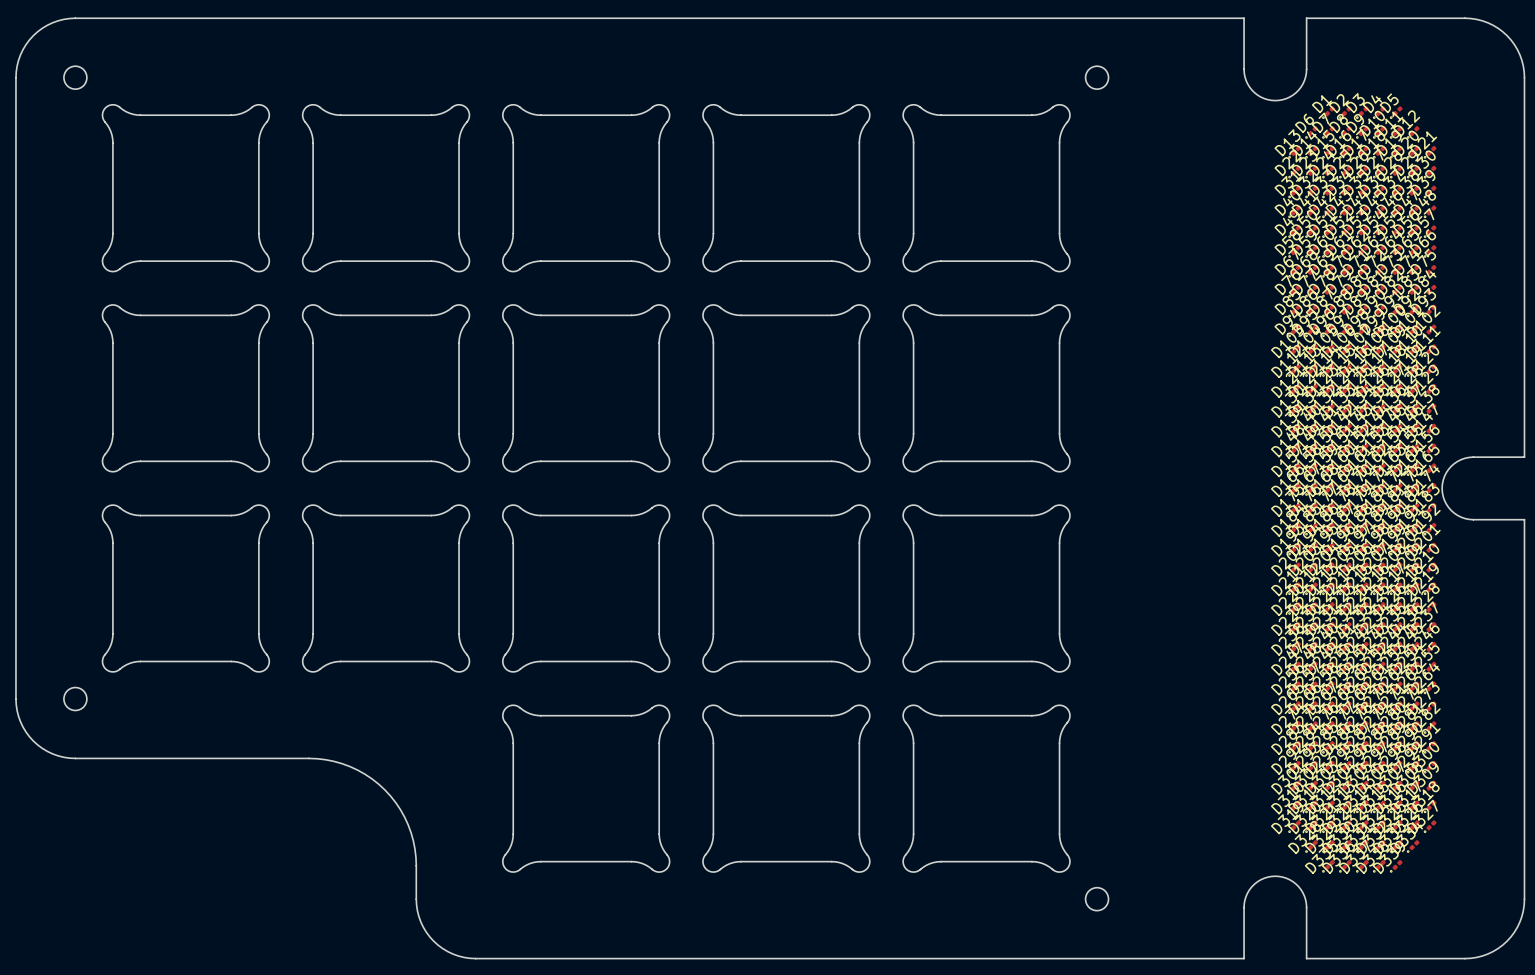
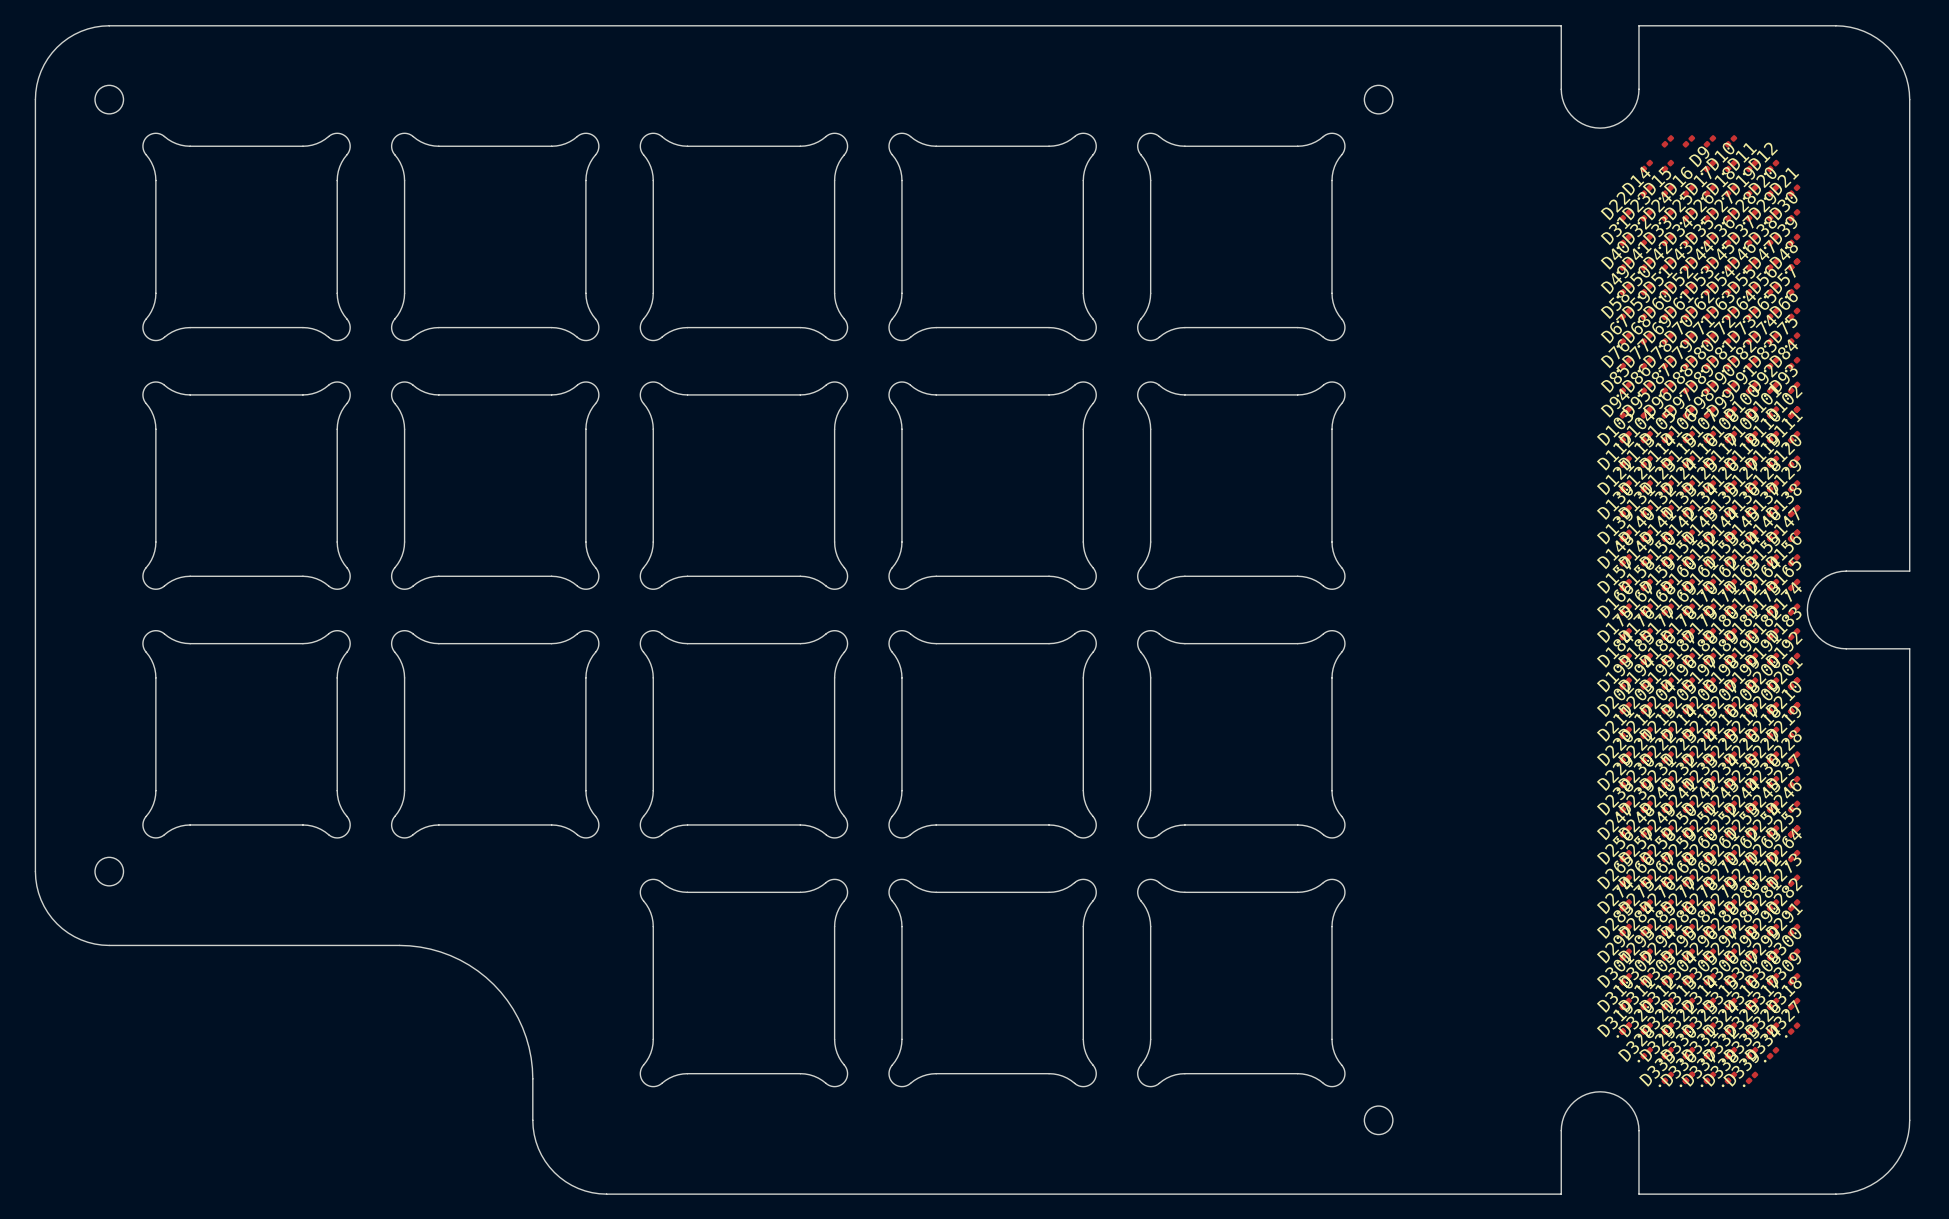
part: none -> (1667, 141)
part: none -> (1688, 141)
part: none -> (1709, 141)
part: none -> (1730, 141)
D1: (1328, 112) -> none
D2: (1345, 112) -> none
D3: (1362, 112) -> none
D4: (1379, 112) -> none
D5: (1396, 112) -> none
part: none -> (1646, 166)
part: none -> (1667, 166)
D6: (1311, 132) -> none
D7: (1328, 132) -> none
D8: (1345, 132) -> none
D13: (1294, 152) -> none
part: none -> (1794, 264)
part: none -> (1794, 412)
part: none -> (1794, 511)
part: none -> (1794, 535)
part: none -> (1794, 683)
part: none -> (1794, 708)
part: none -> (1794, 831)
part: none -> (1625, 1028)
part: none -> (1688, 1077)

